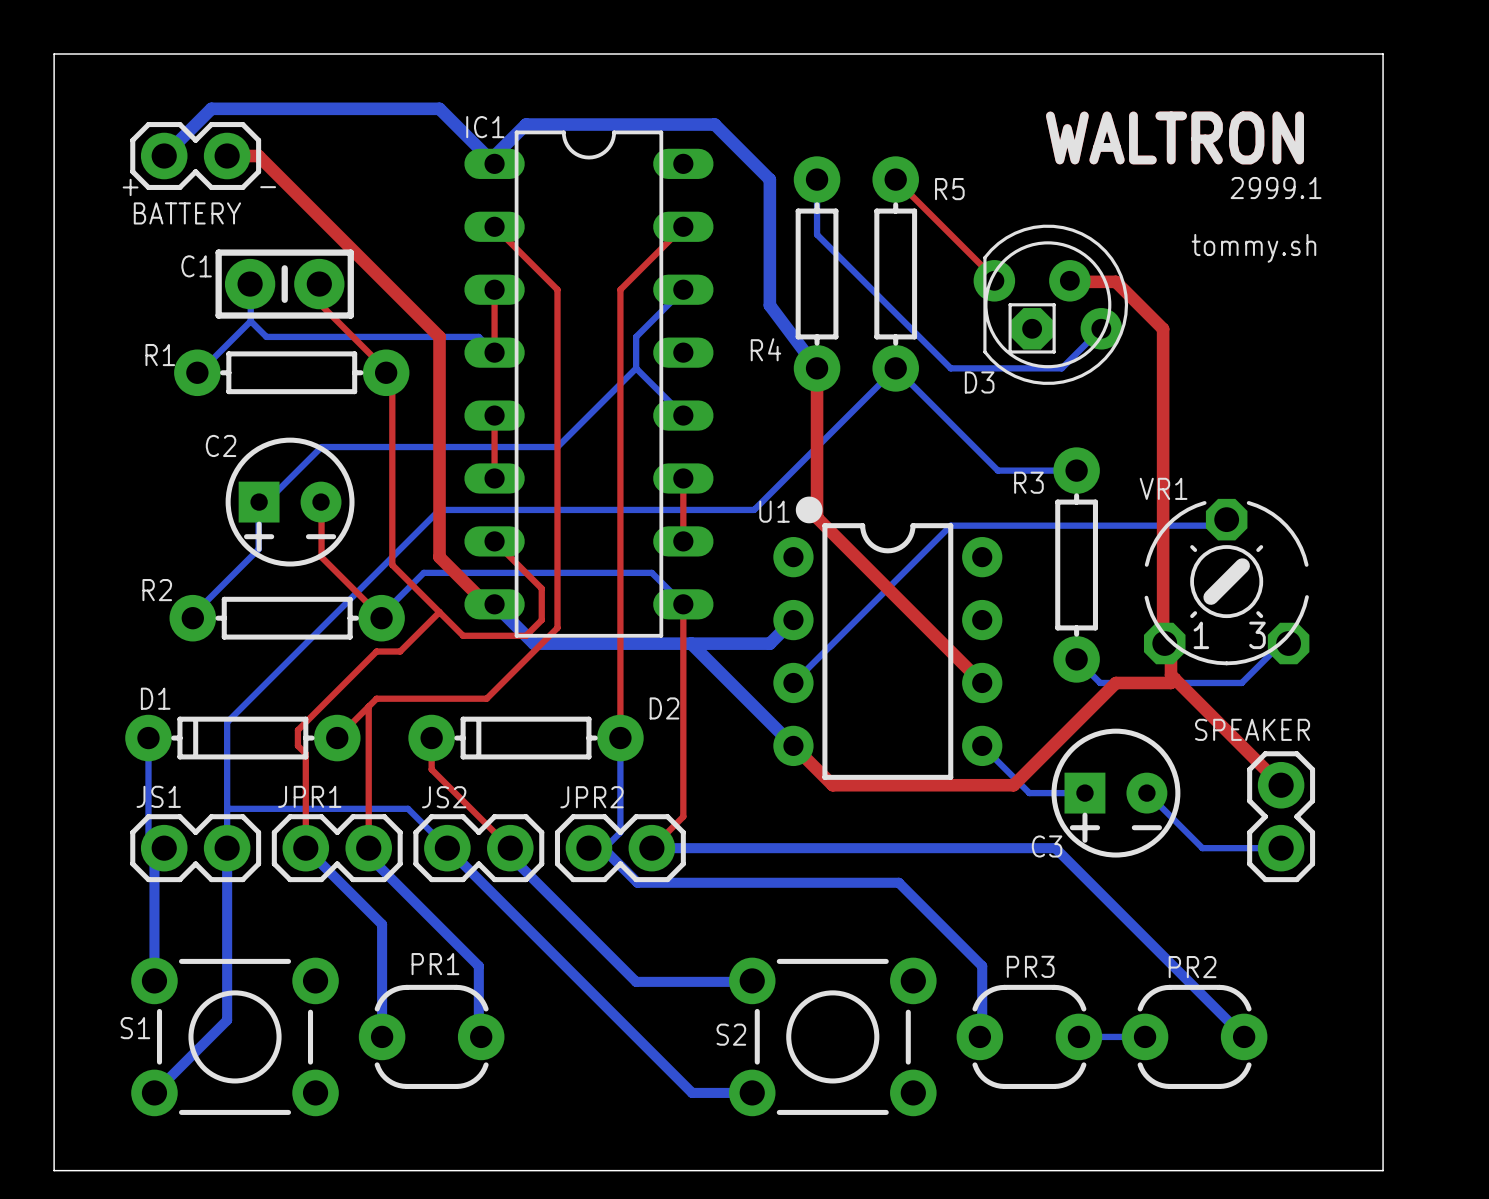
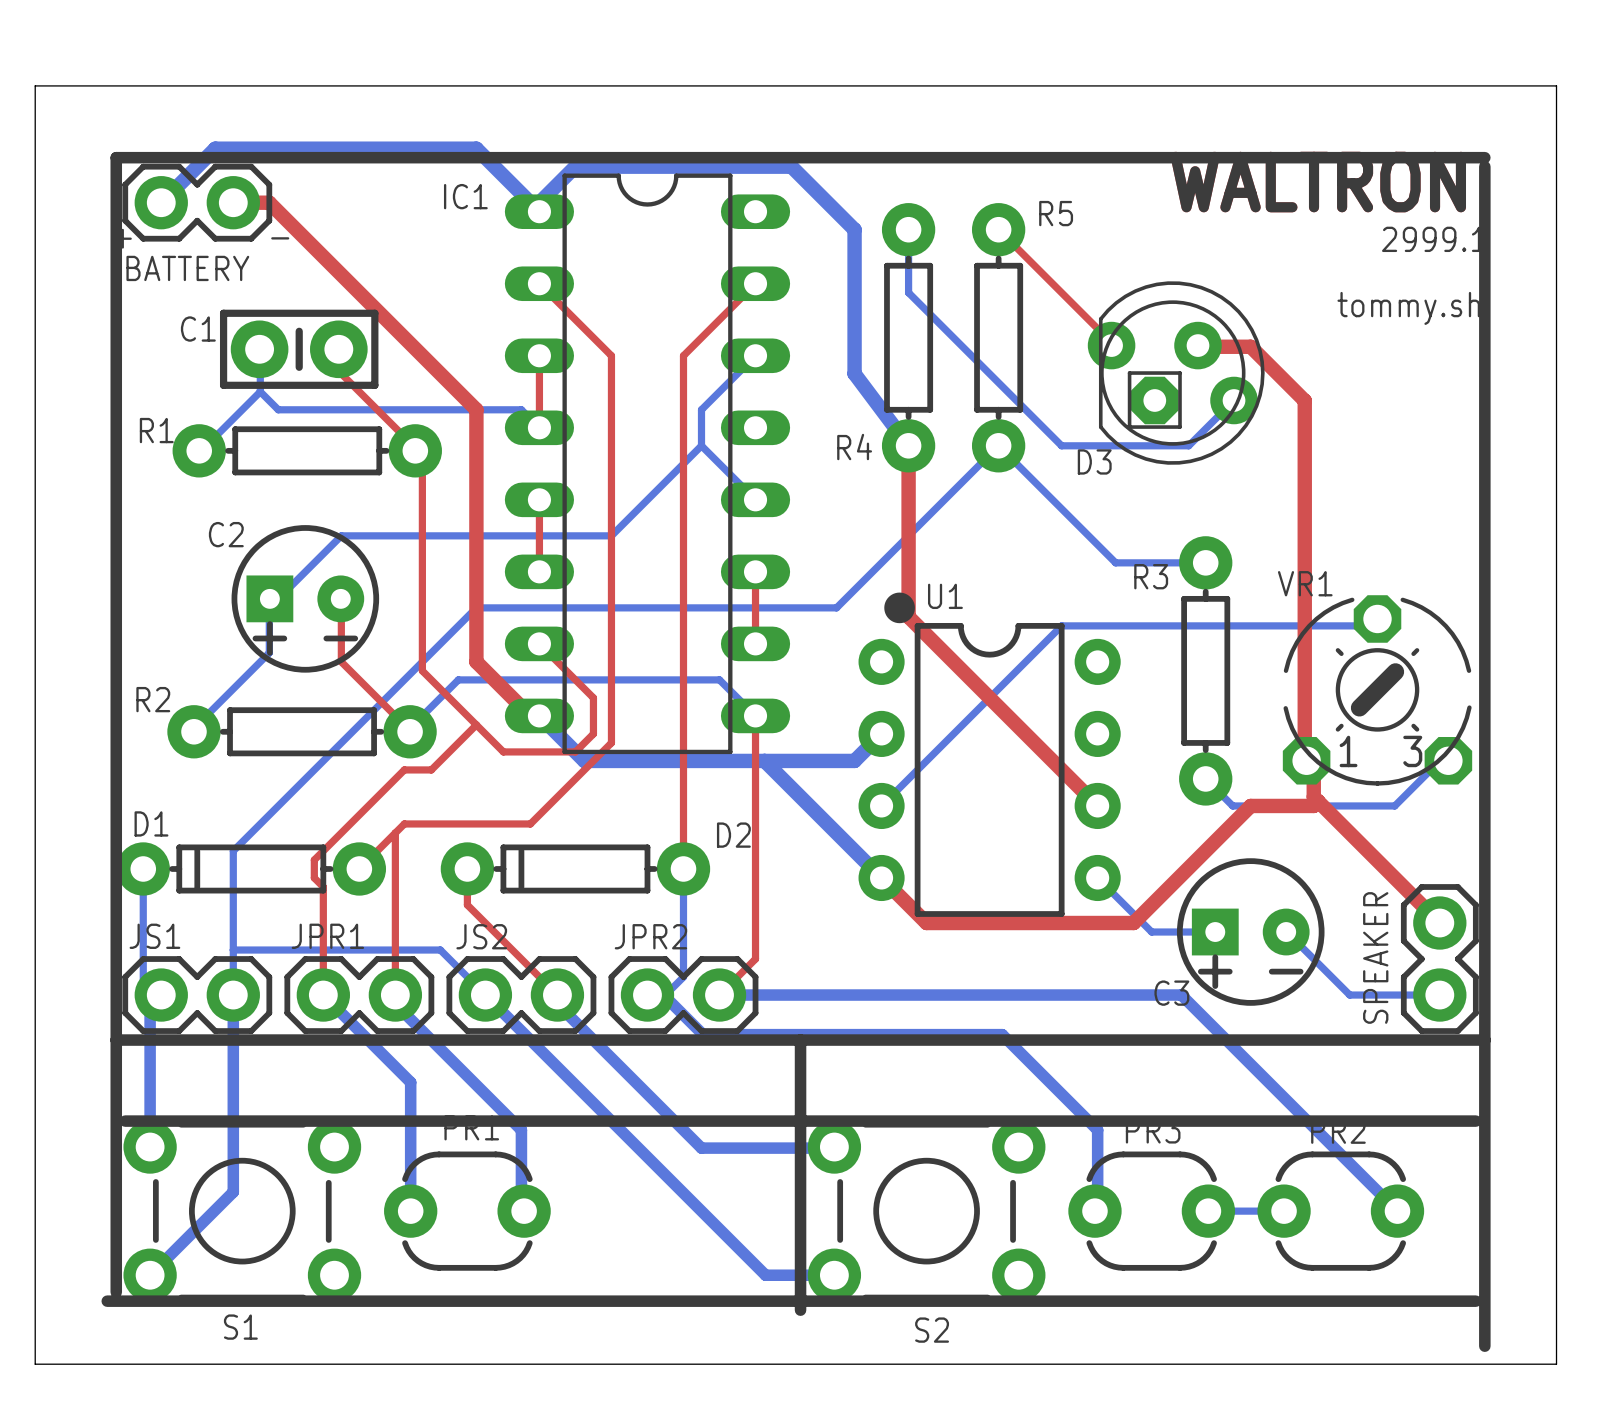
line: none -> (1484, 157) (116, 157) (116, 1292)
line: none -> (1484, 166) (1484, 1346)
IC1 name position: IC1 (485, 127) -> IC1 (465, 196)
R5 name position: R5 (949, 189) -> R5 (1056, 213)
R4 name position: R4 (765, 349) -> R4 (854, 447)
U1 name position: U1 (774, 511) -> U1 (945, 596)
SPEAKER name rotation: 0° (1252, 729) -> 90° counterclockwise (1375, 957)
line: none -> (116, 1040) (1484, 1040)
line: none -> (800, 1040) (800, 1310)
line: none -> (125, 1121) (1475, 1121)
S1 name position: S1 (135, 1028) -> S1 (240, 1327)
S2 name position: S2 (731, 1034) -> S2 (932, 1330)
line: none -> (107, 1301) (1475, 1301)

